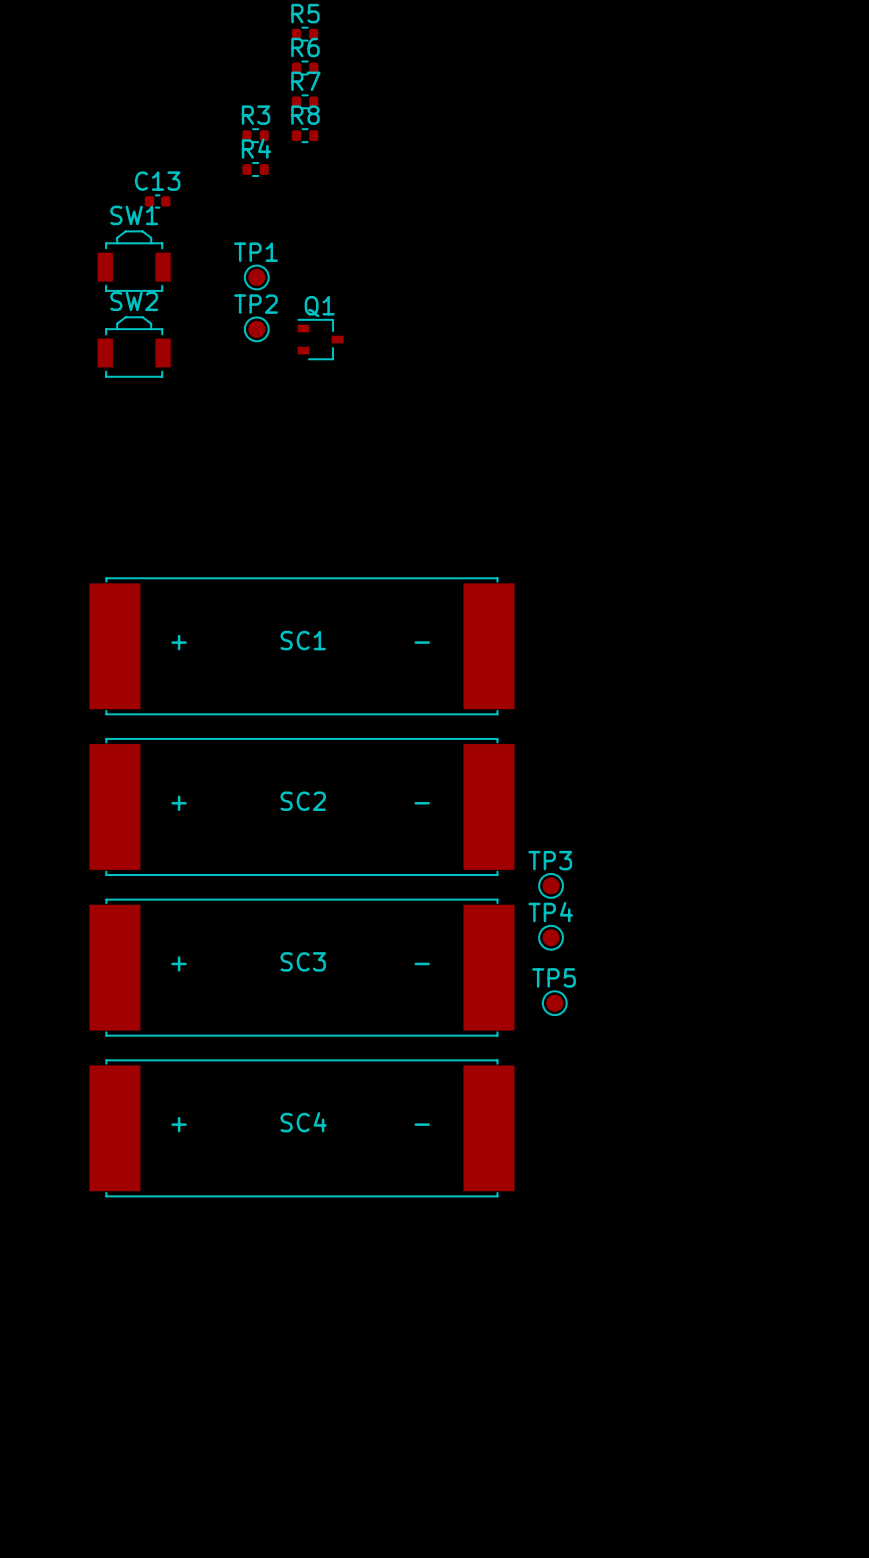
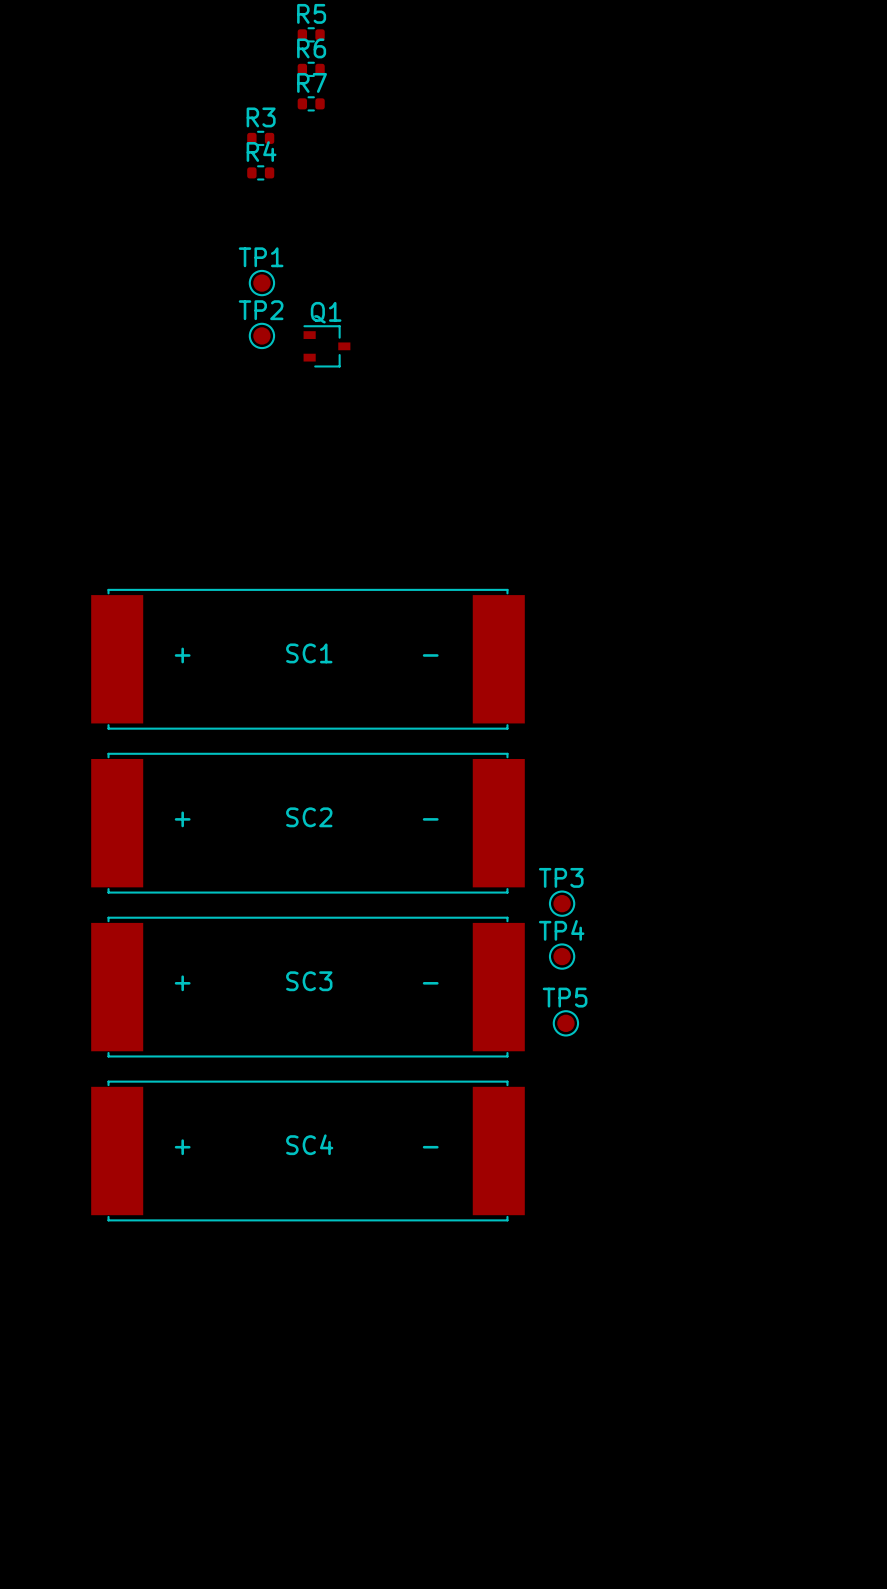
R8: (305, 135) -> none
C13: (157, 201) -> none
SW1: (134, 261) -> none
SW2: (134, 347) -> none

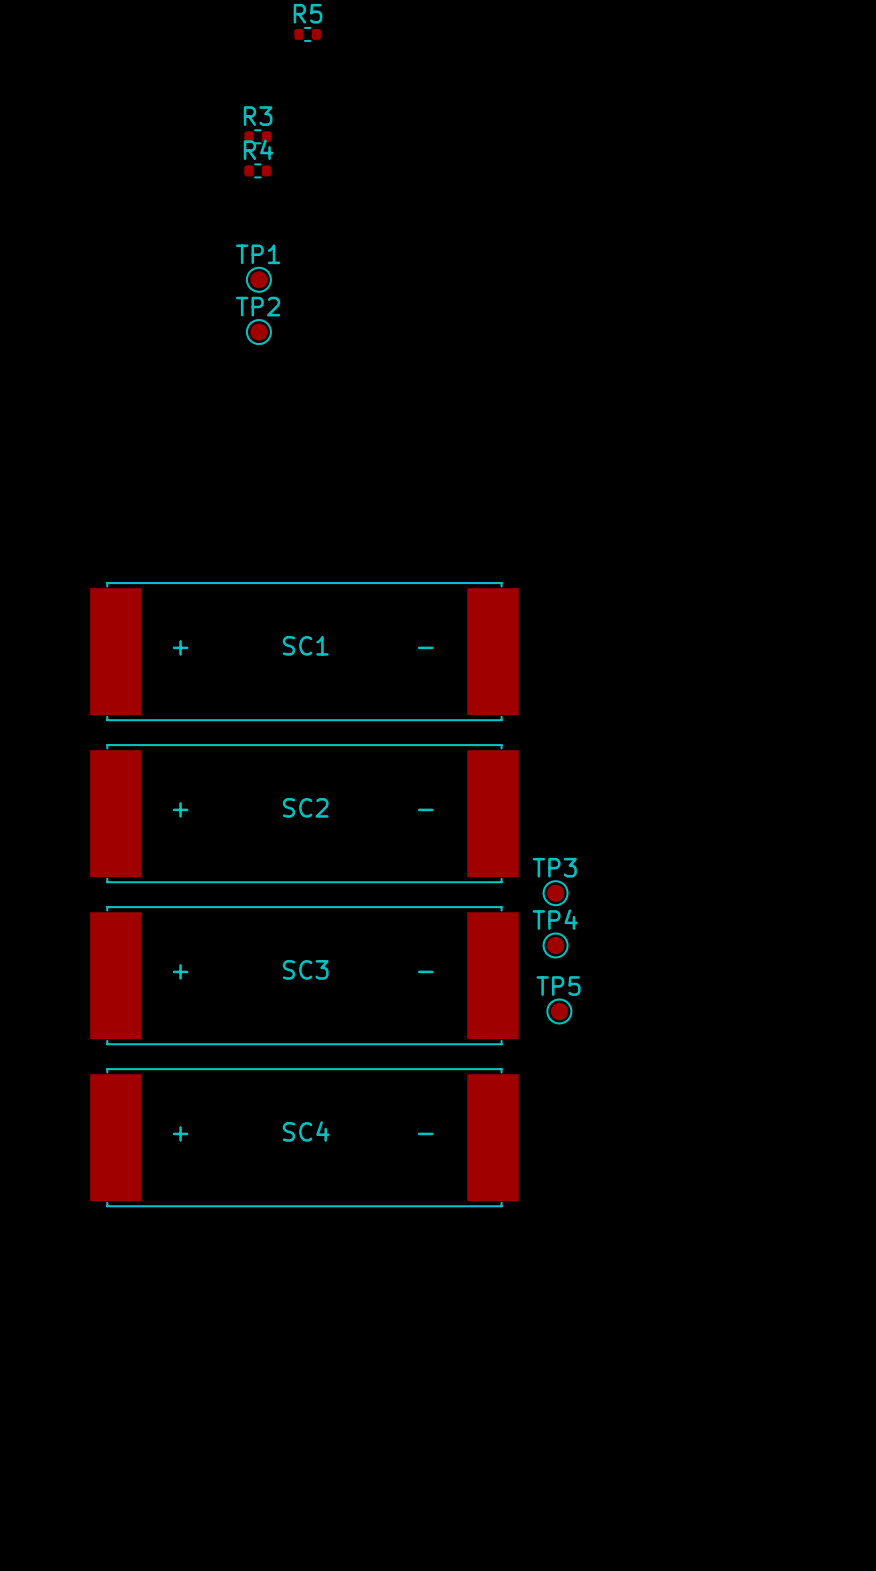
R6: (311, 69) -> none
R7: (311, 103) -> none
Q1: (326, 346) -> none

